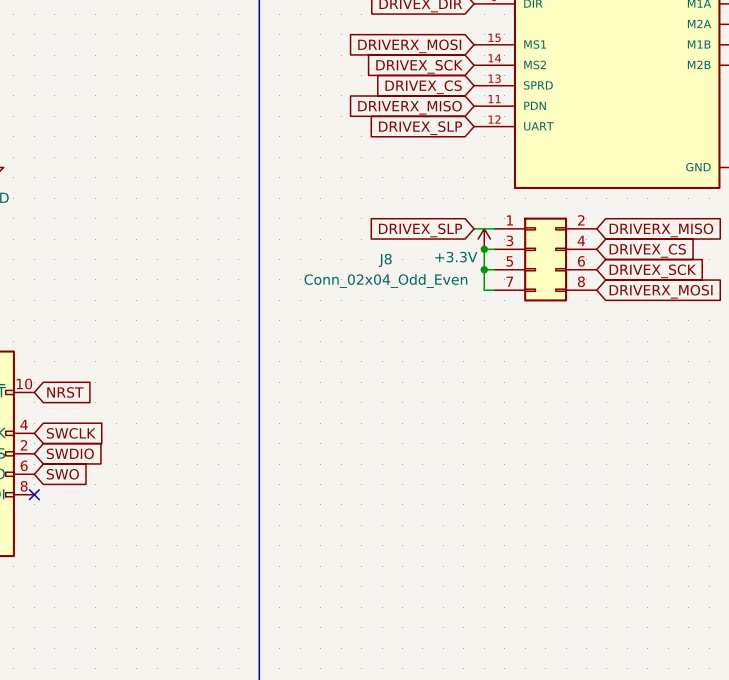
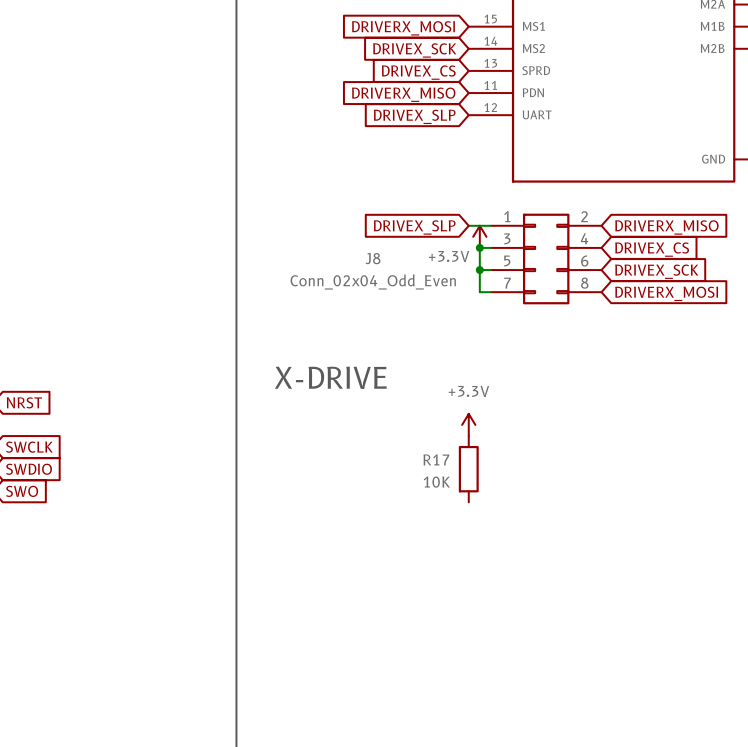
text: none -> X-DRIVE (330, 377)
power symbol: none -> +3.3V (468, 424)
R17: none -> 10K (468, 469)

